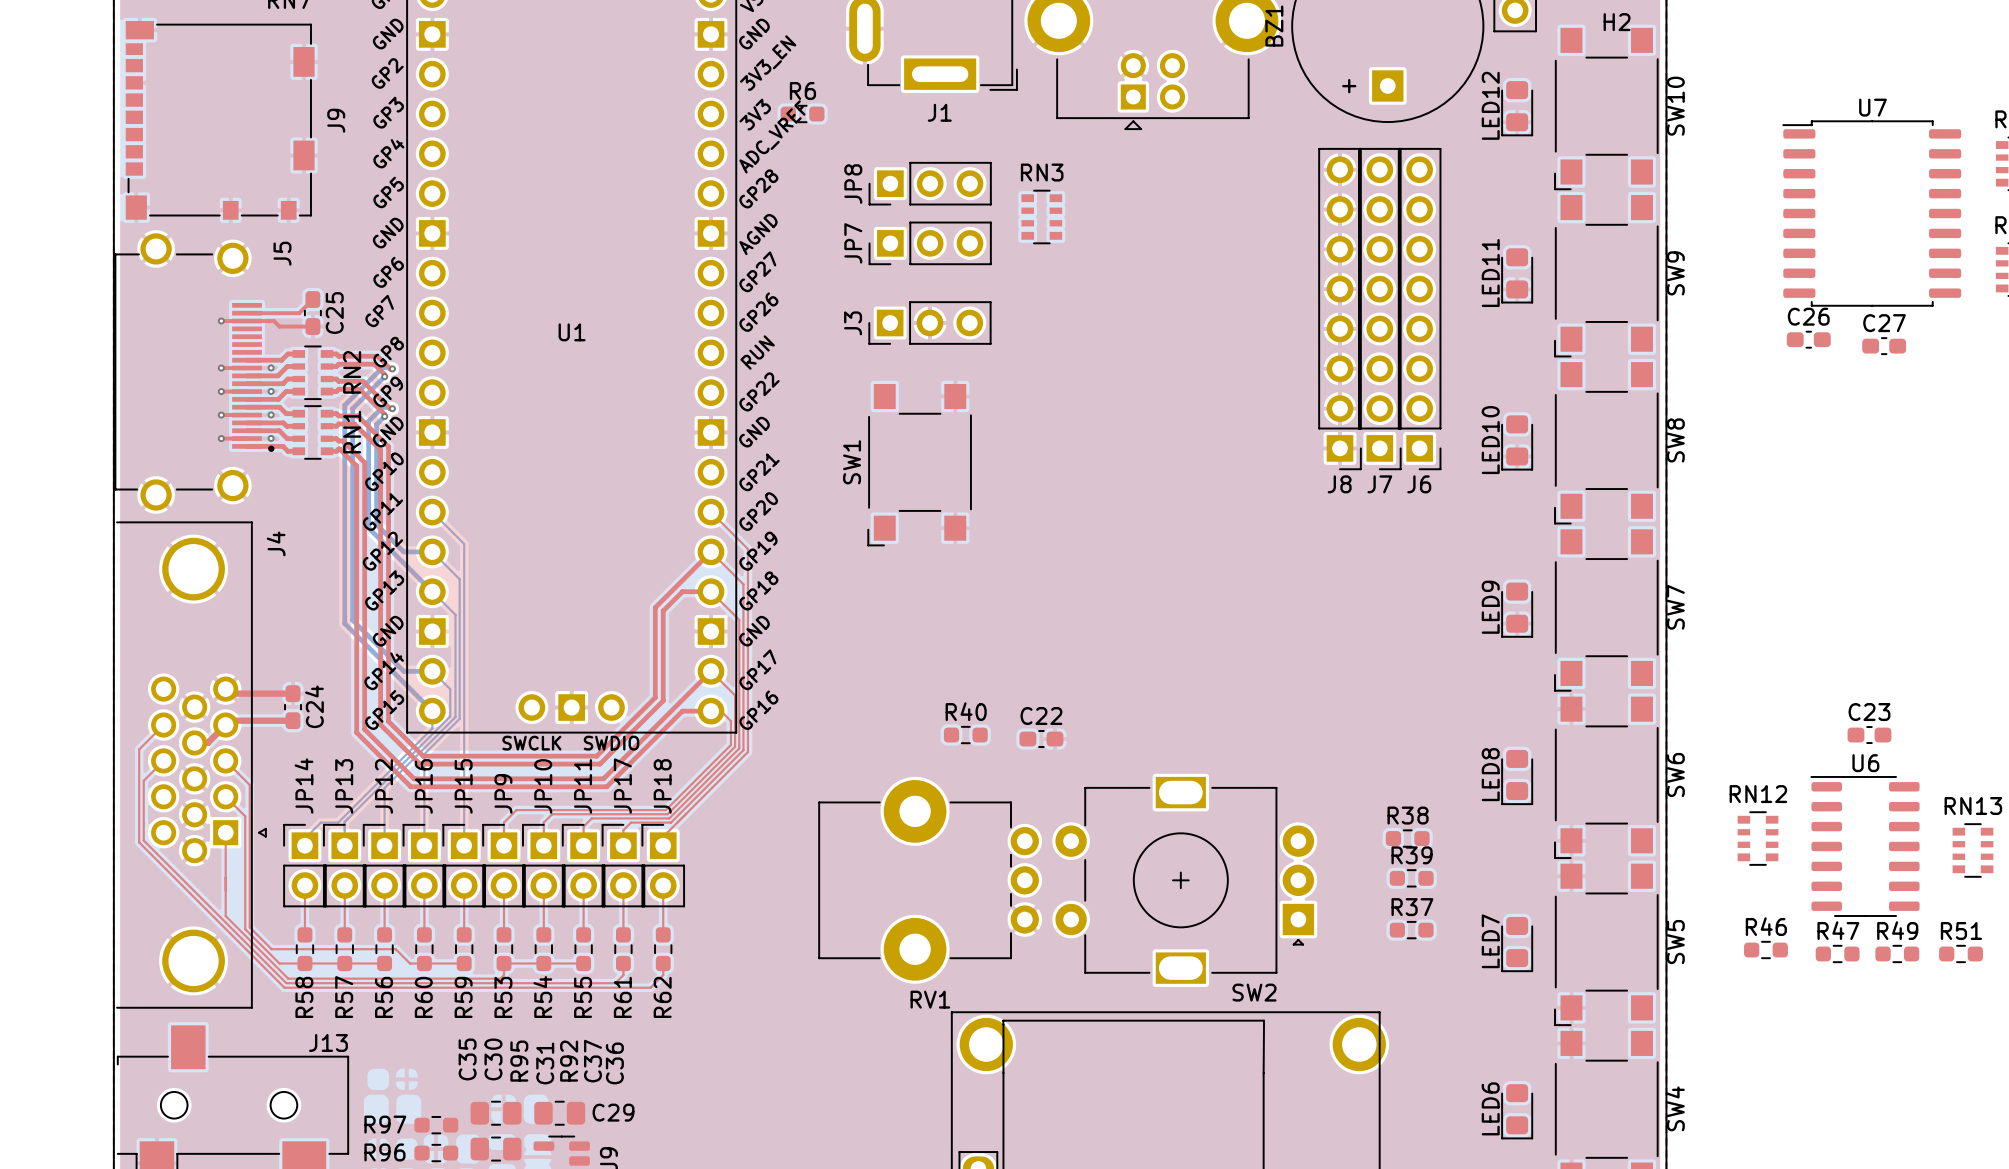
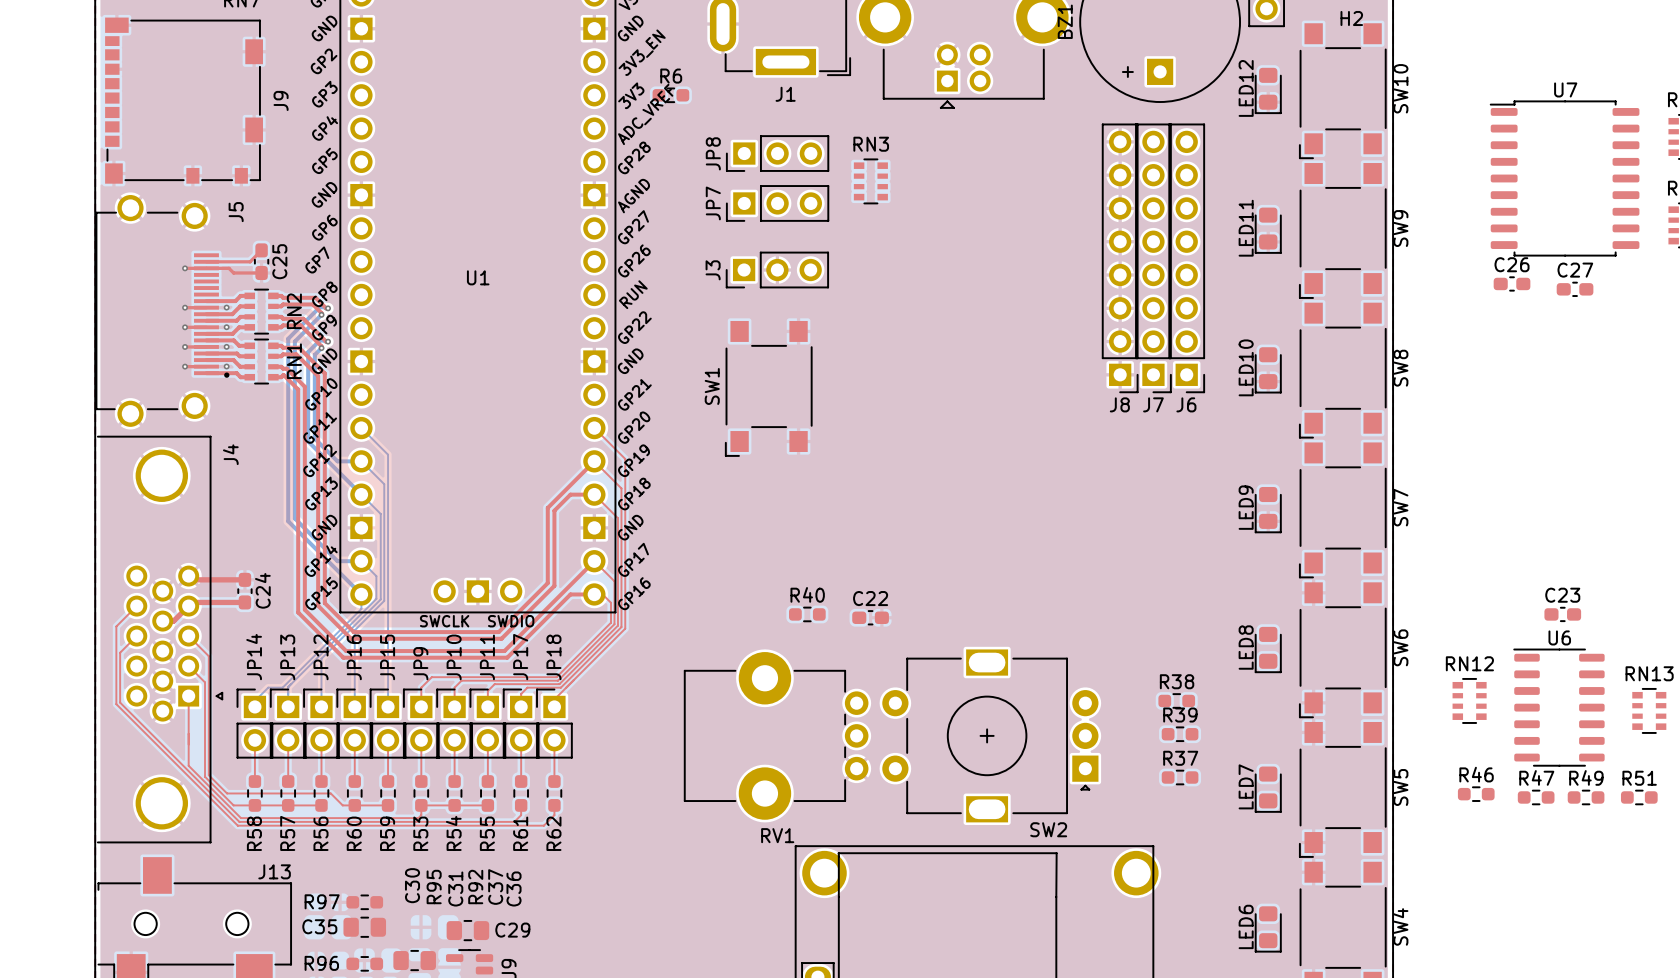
C35 name rotation: 0° (467, 1059) -> 90° clockwise (319, 926)
C35 name position: C35 (467, 1059) -> C35 (319, 926)
C35 position: (496, 1113) -> (364, 927)
R97 position: (436, 1125) -> (364, 902)

